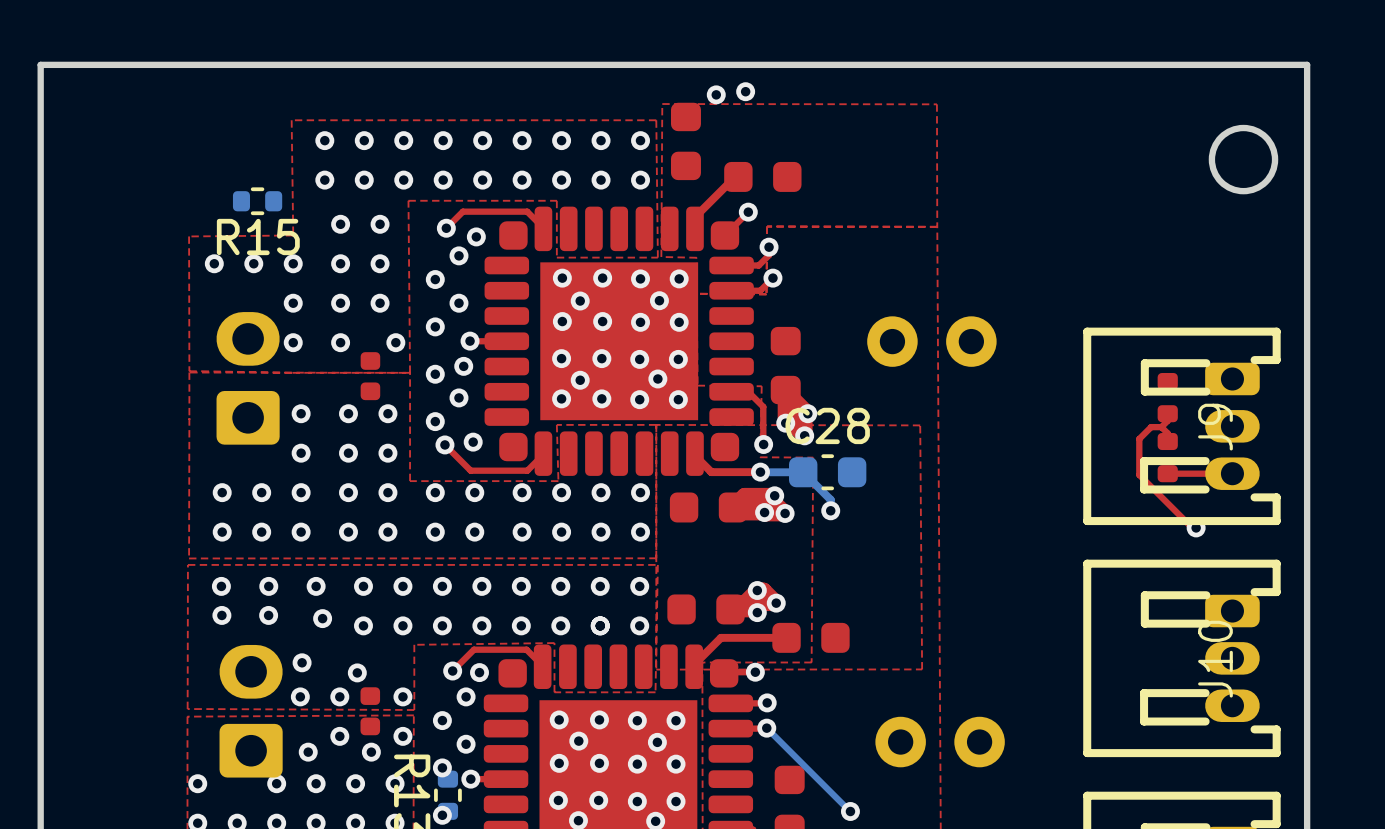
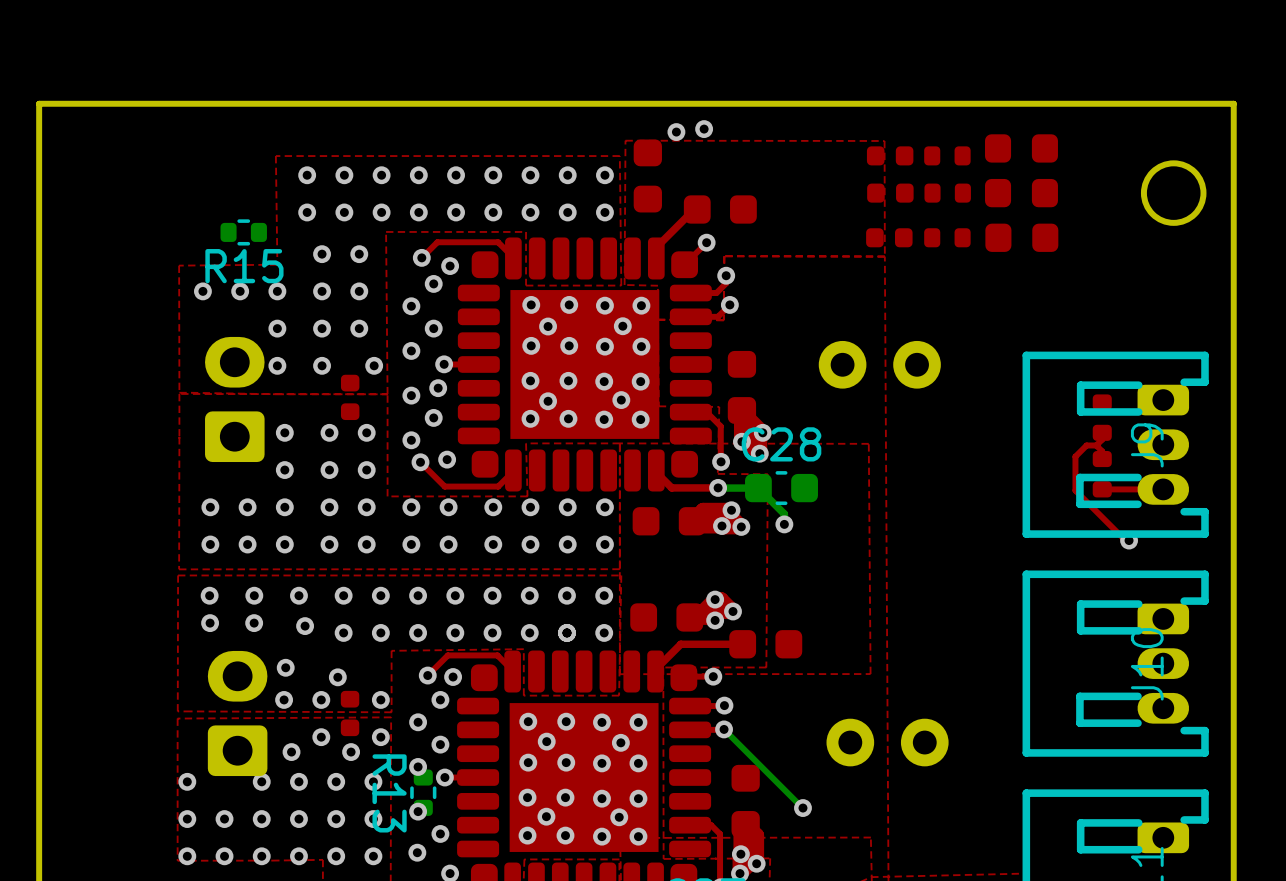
part: none -> (1021, 148)
part: none -> (890, 155)
part: none -> (947, 155)
part: none -> (890, 193)
part: none -> (947, 193)
part: none -> (1021, 193)
part: none -> (889, 237)
part: none -> (947, 237)
part: none -> (1021, 237)

